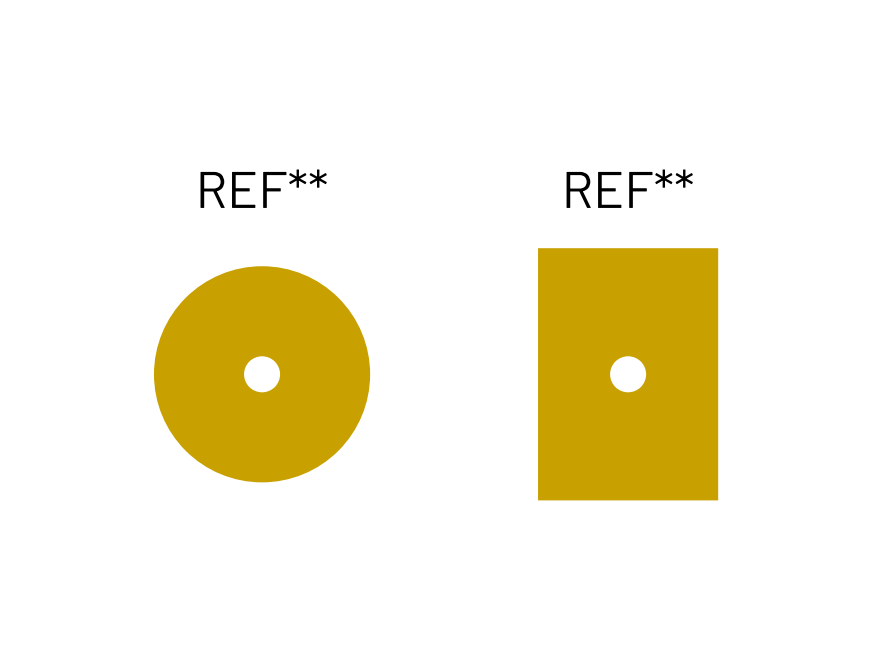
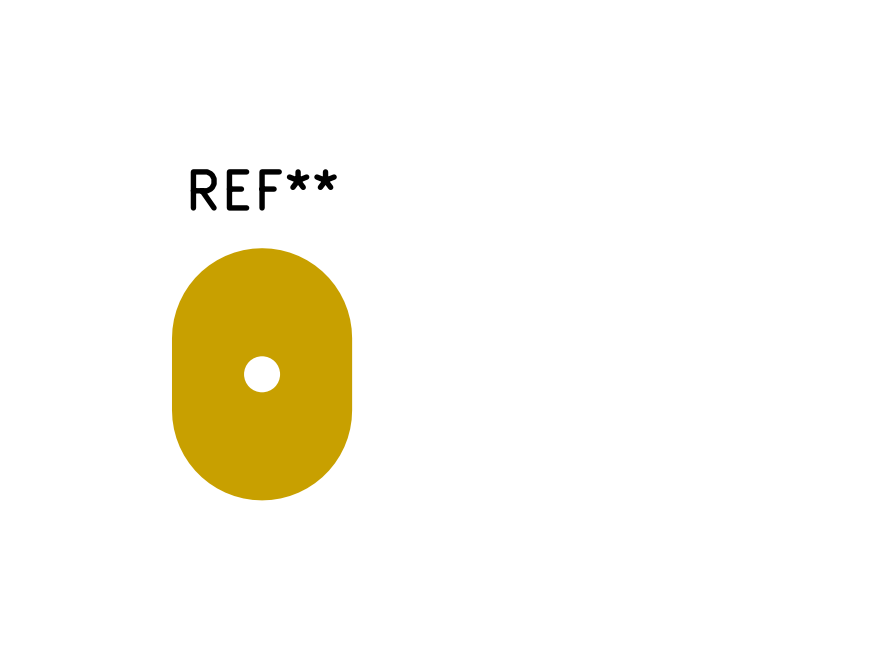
REF** footprint: [153, 266, 371, 483] -> [171, 248, 353, 501]
REF**: (628, 374) -> none

